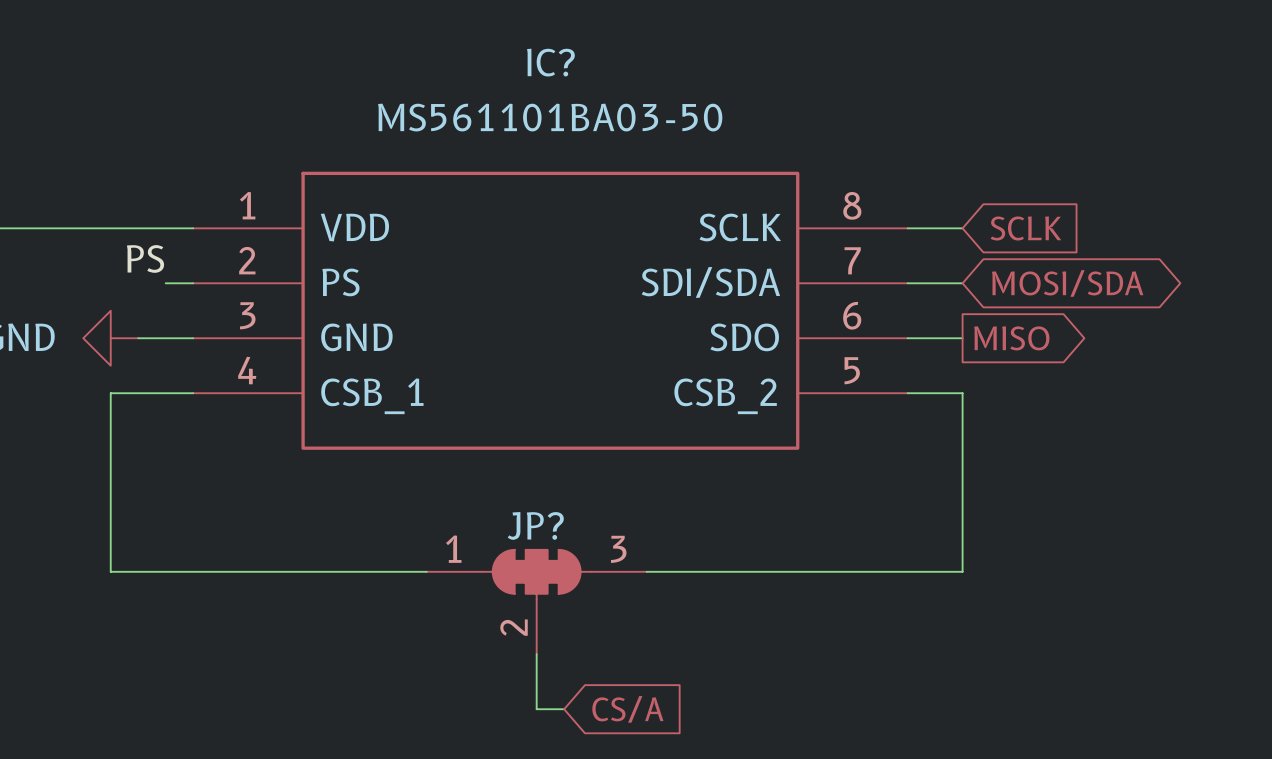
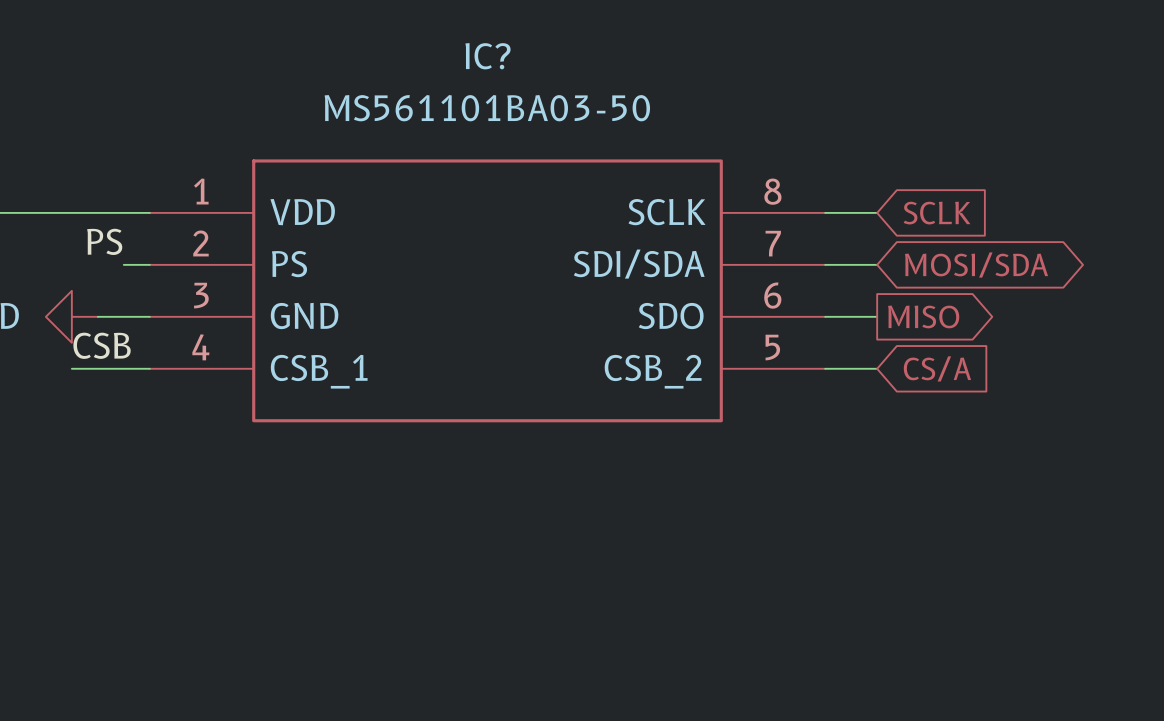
label: none -> CSB (102, 345)
wire: (110, 393) (110, 571) (426, 571) -> none
wire: (962, 393) (962, 571) (646, 571) -> none
JP?: (536, 602) -> none
wire: (536, 654) (536, 709) (564, 709) -> none
global label position: CS/A (627, 709) -> CS/A (937, 368)

